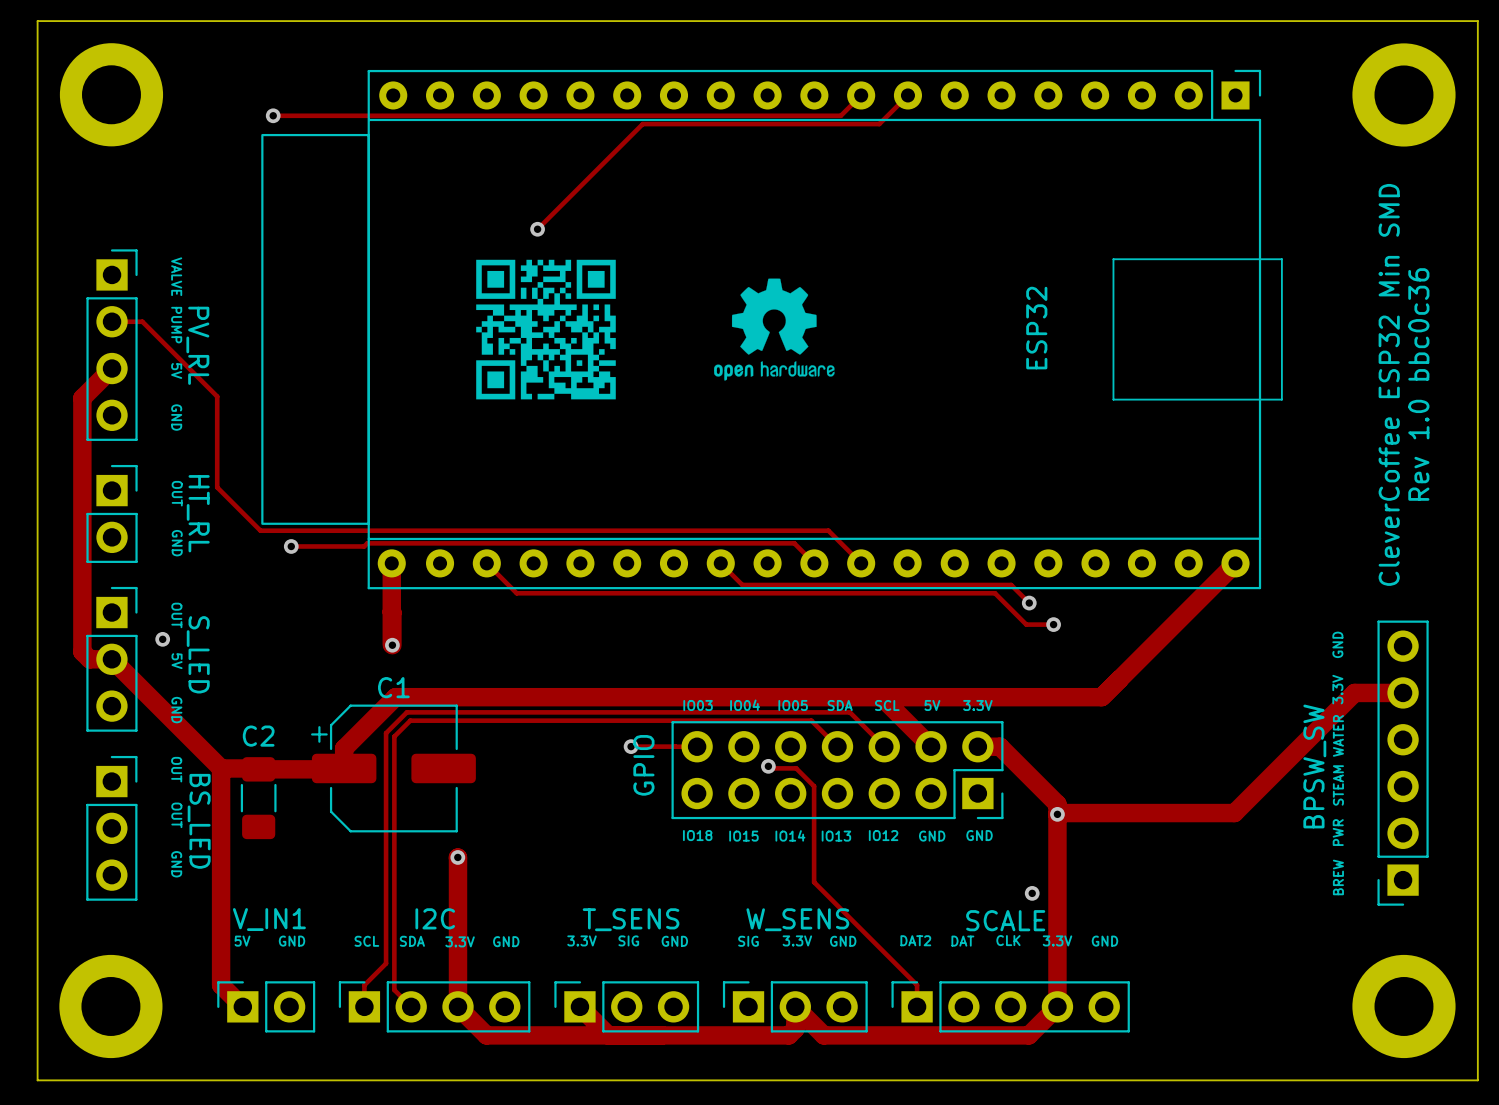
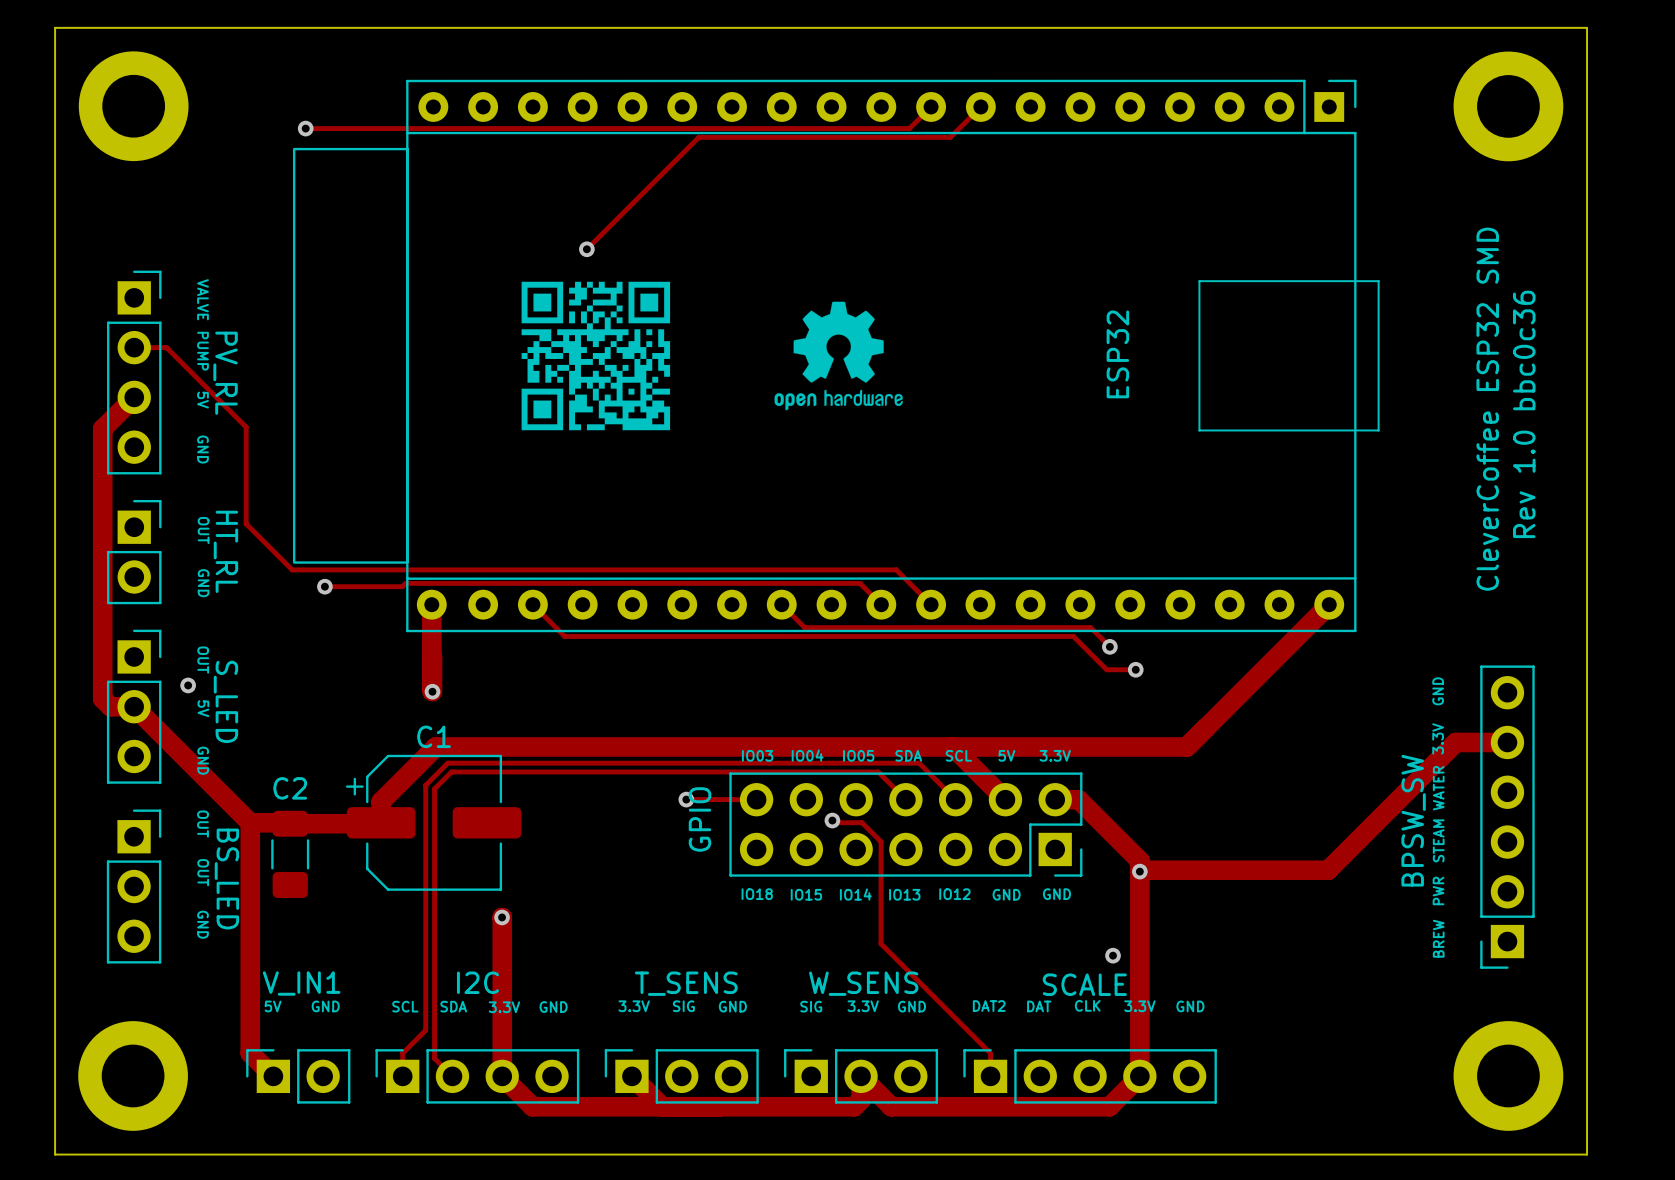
text: CleverCoffee ESP32 Min SMD (1389, 384) -> CleverCoffee ESP32 SMD (1487, 409)

